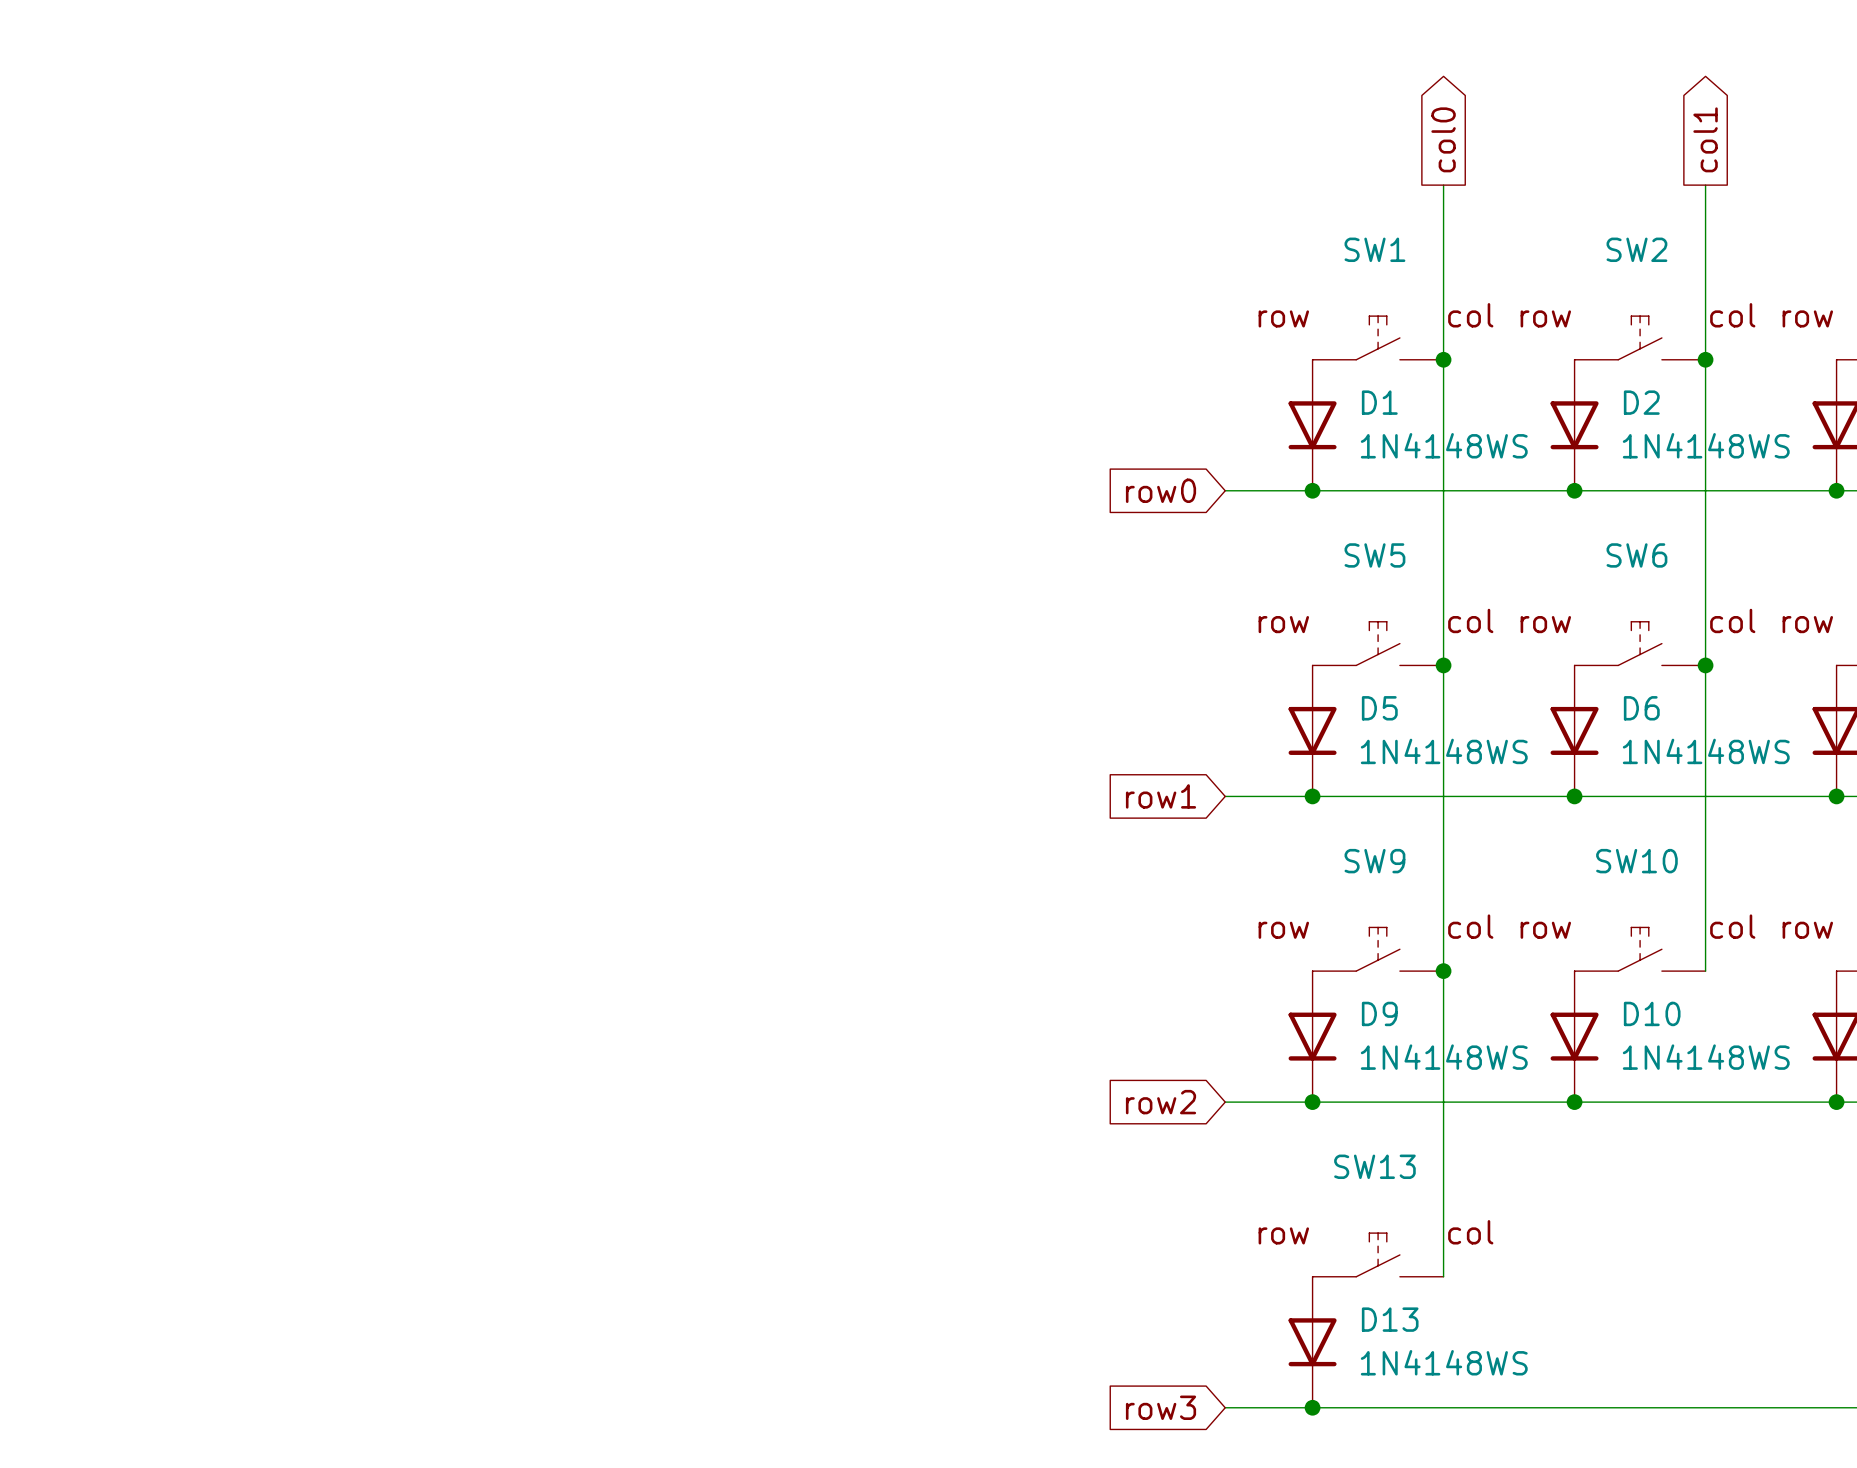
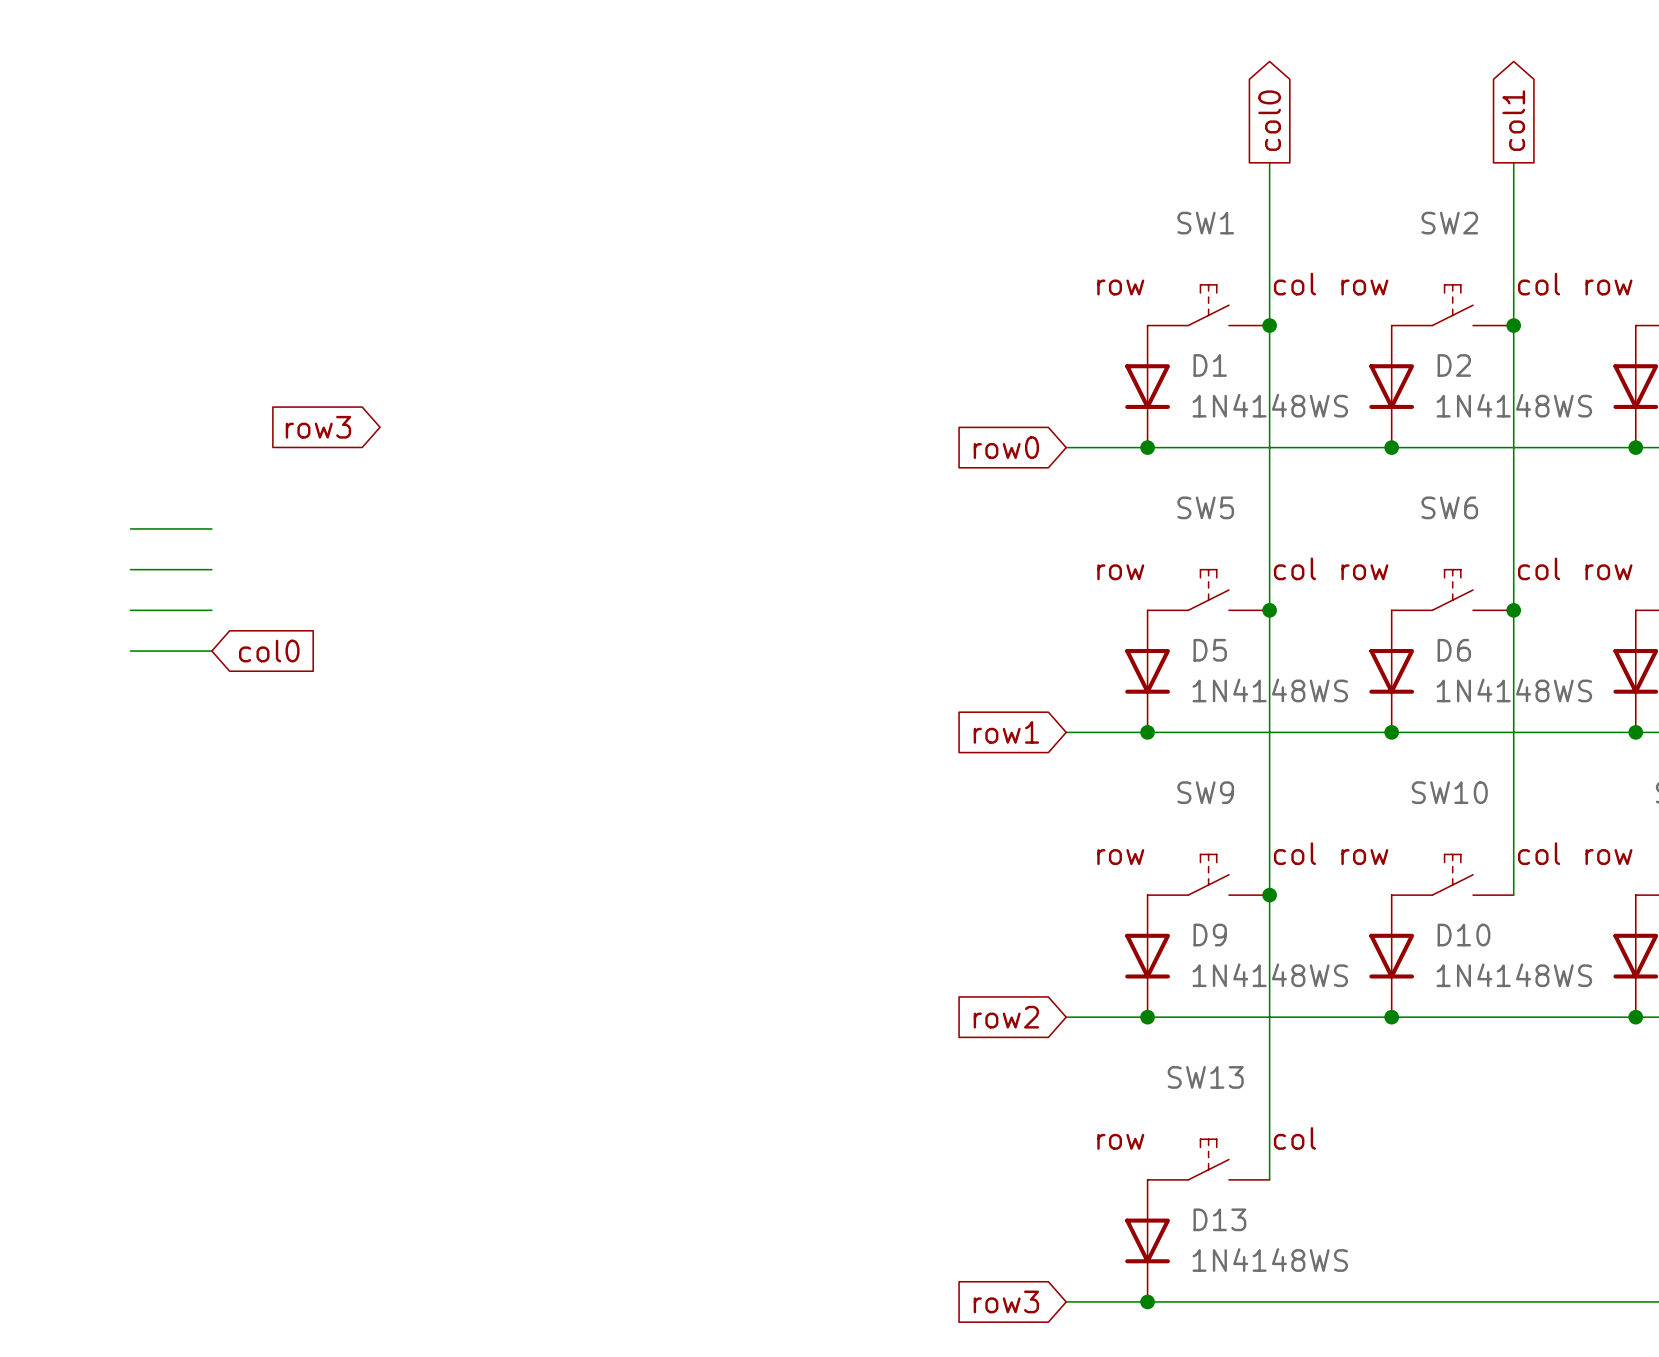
global label: none -> row3 (318, 427)
wire: none -> (130, 528) (211, 528)
wire: none -> (130, 569) (211, 569)
wire: none -> (130, 610) (211, 610)
wire: none -> (130, 651) (211, 651)
global label: none -> col0 (269, 651)

